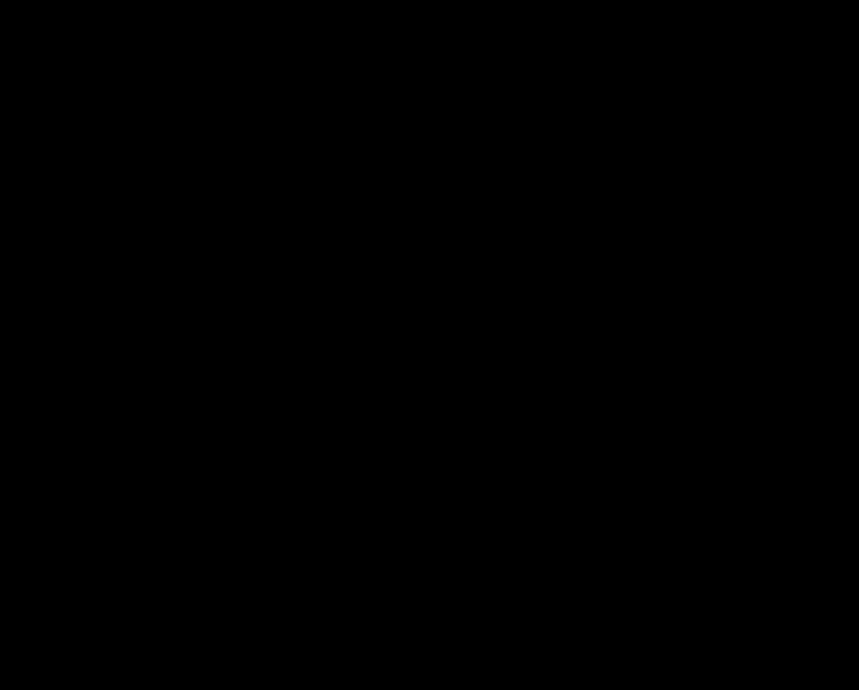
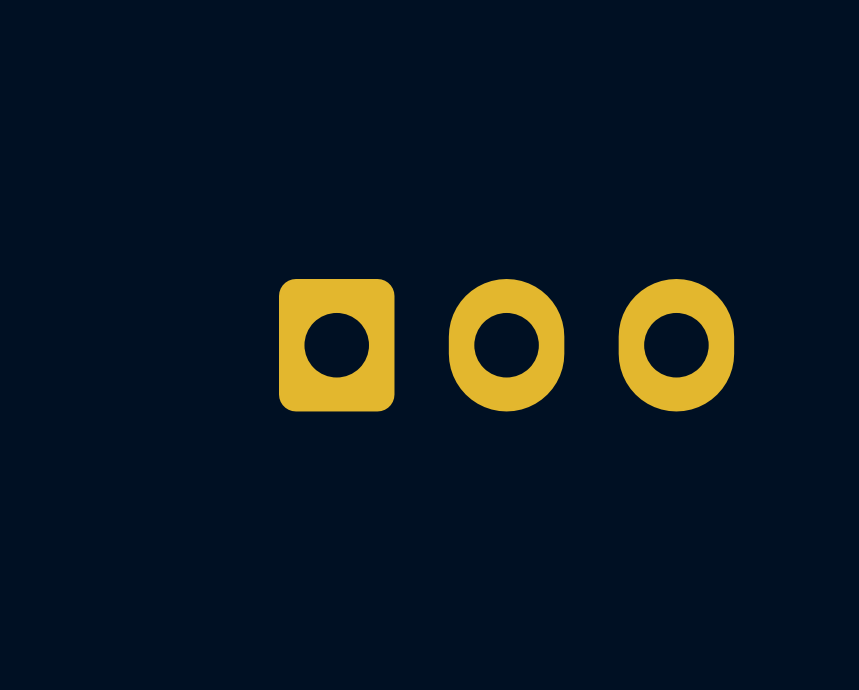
part: none -> (506, 345)

